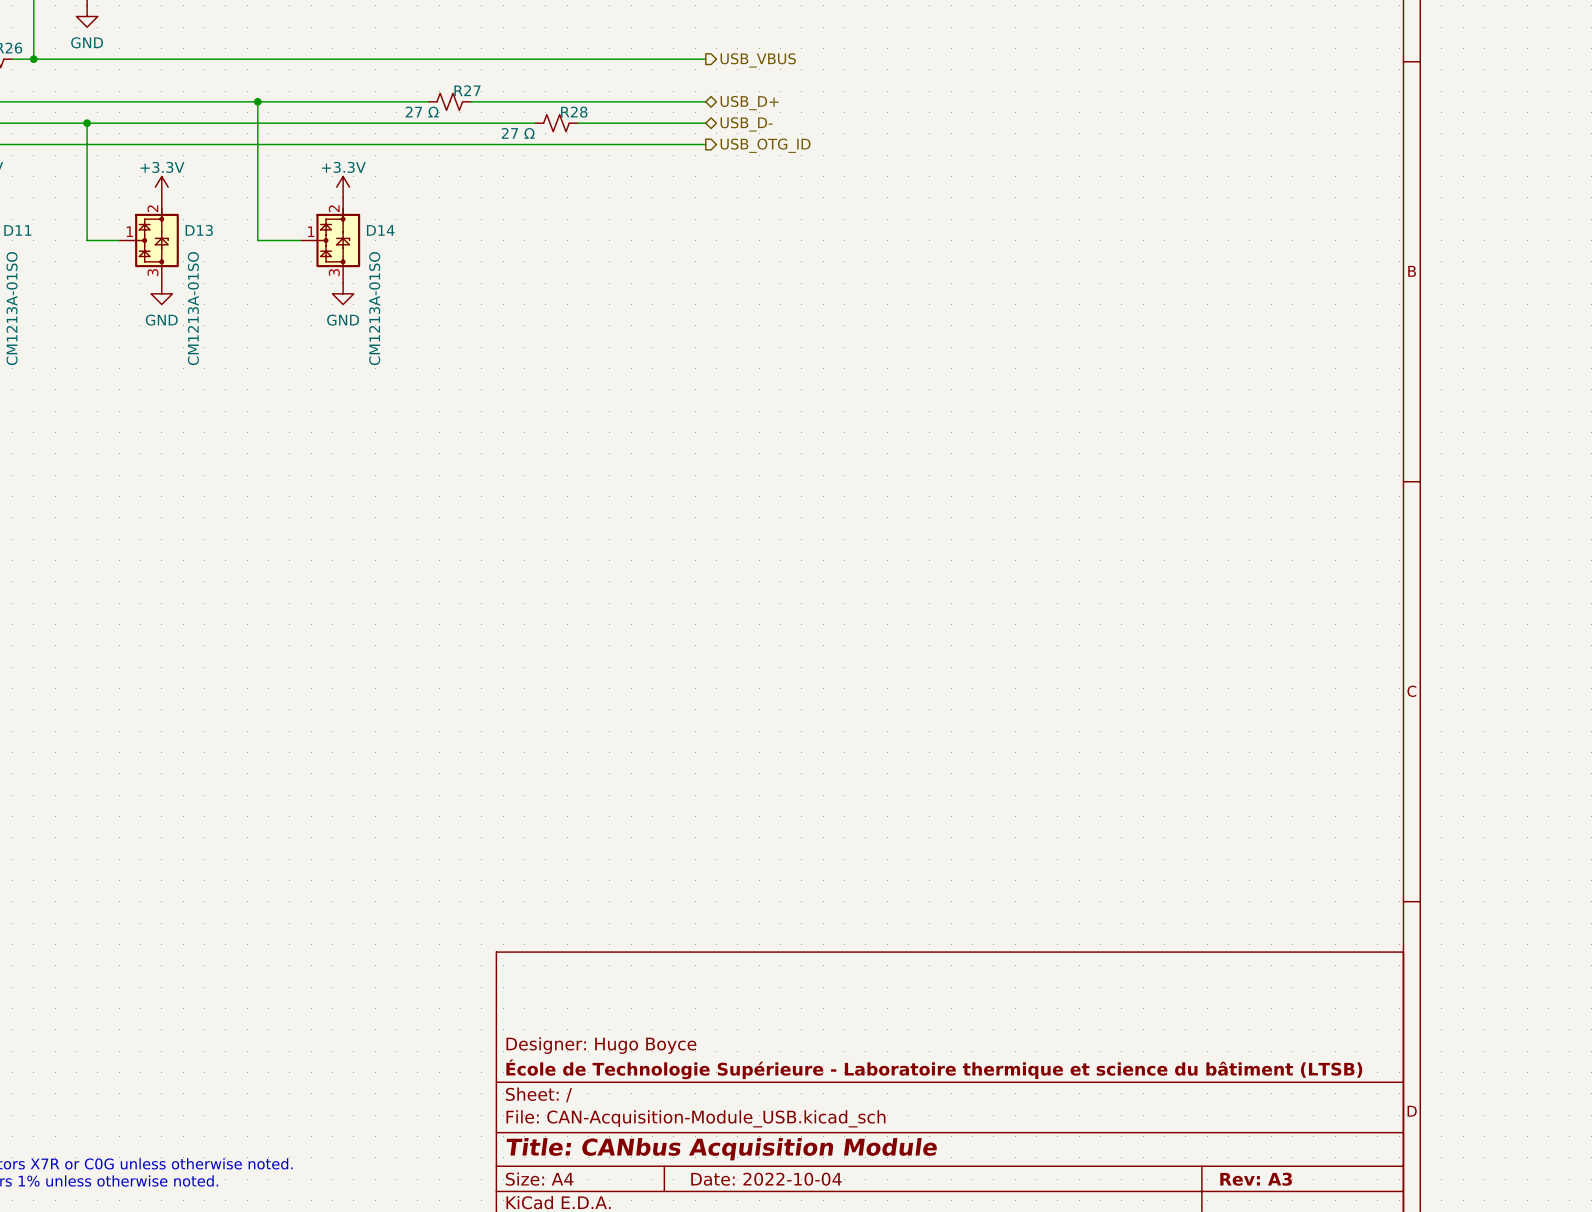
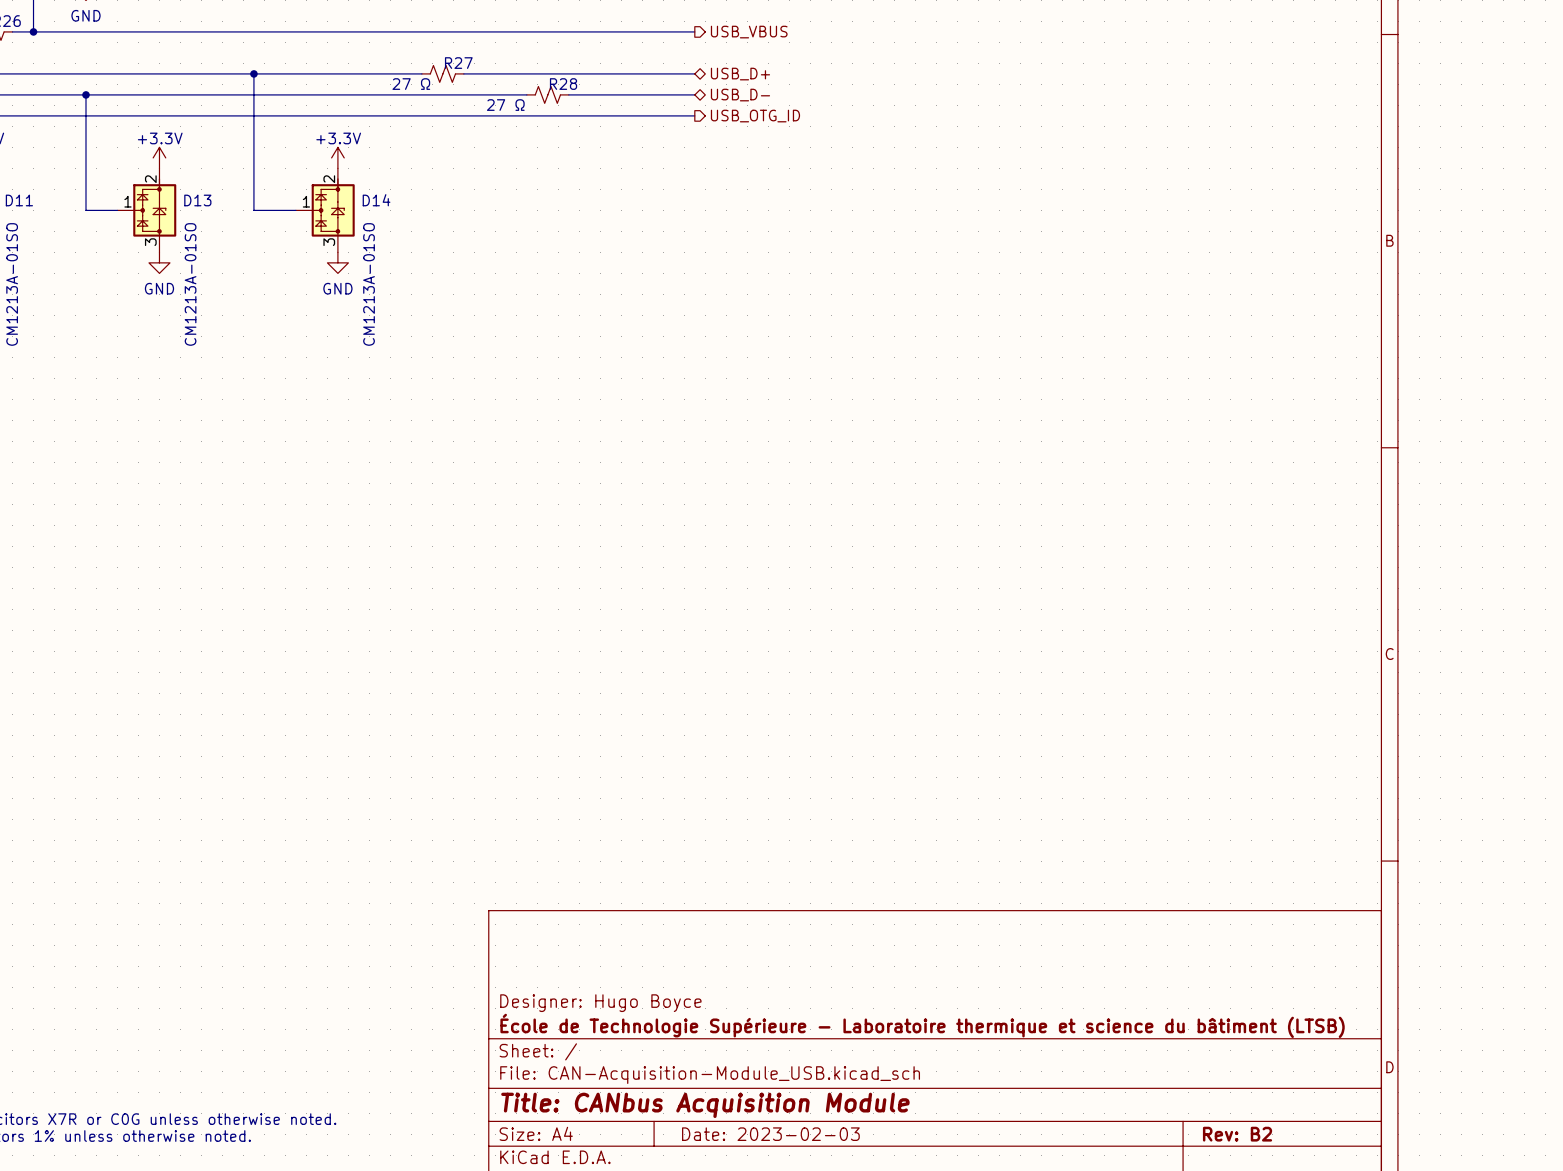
title block: Date: 2022-10-04 (766, 1179) -> Date: 2023-02-03 (770, 1134)
title block: Rev: A3 (1256, 1179) -> Rev: B2 (1237, 1134)

